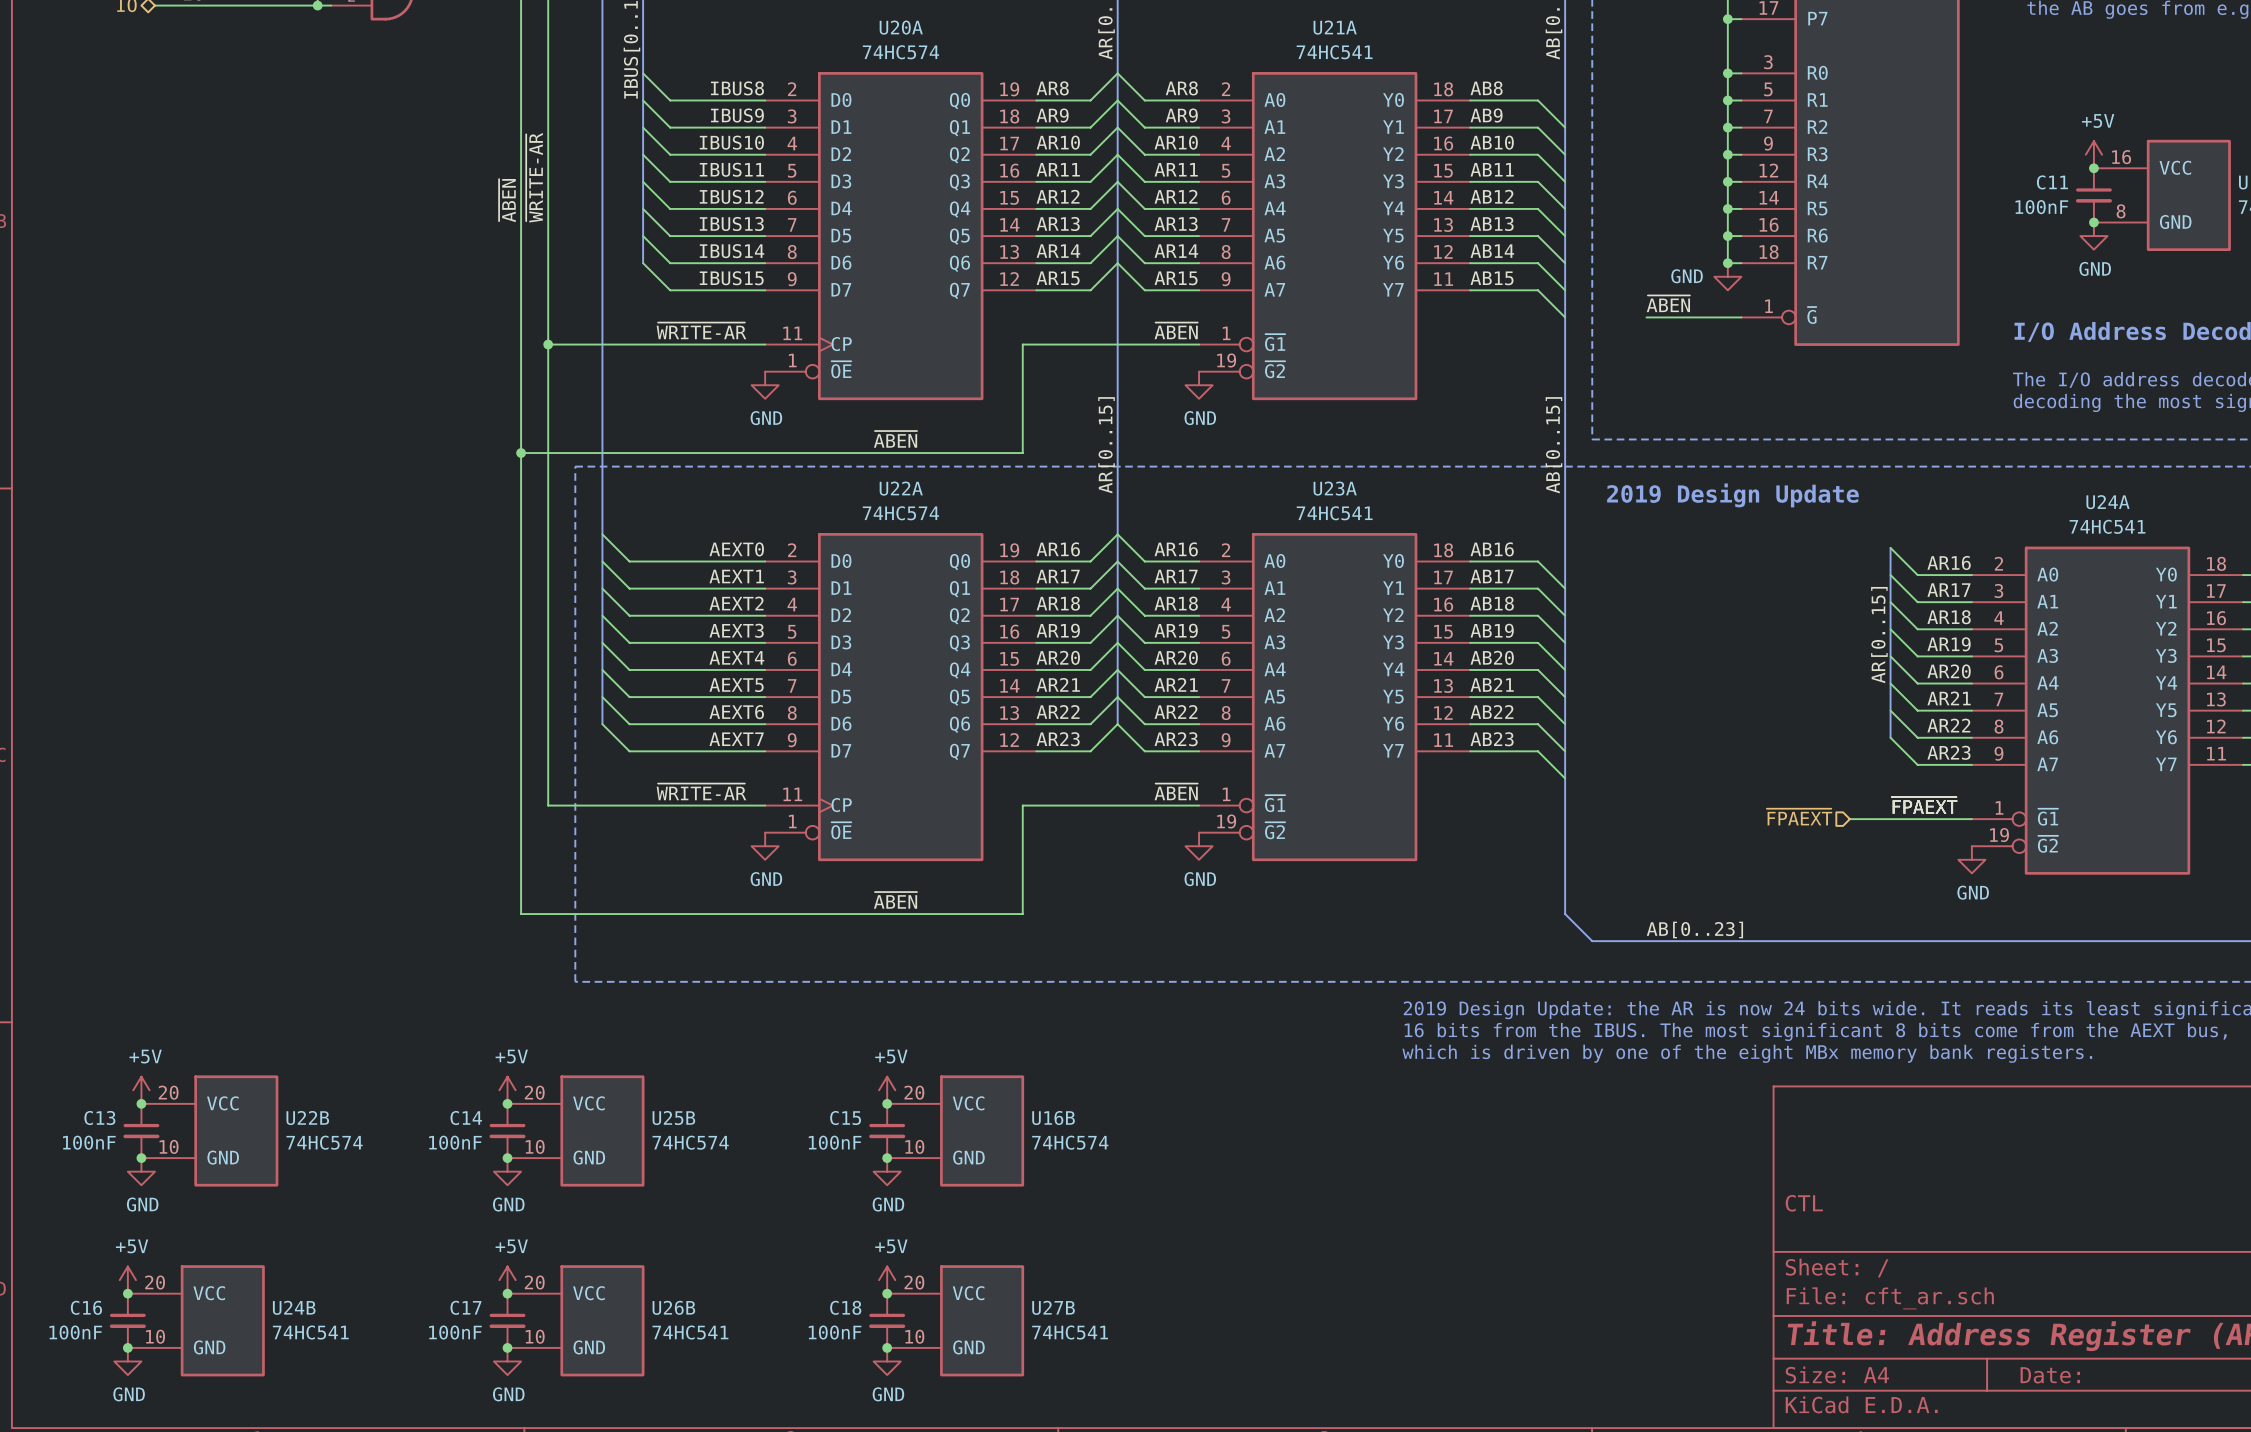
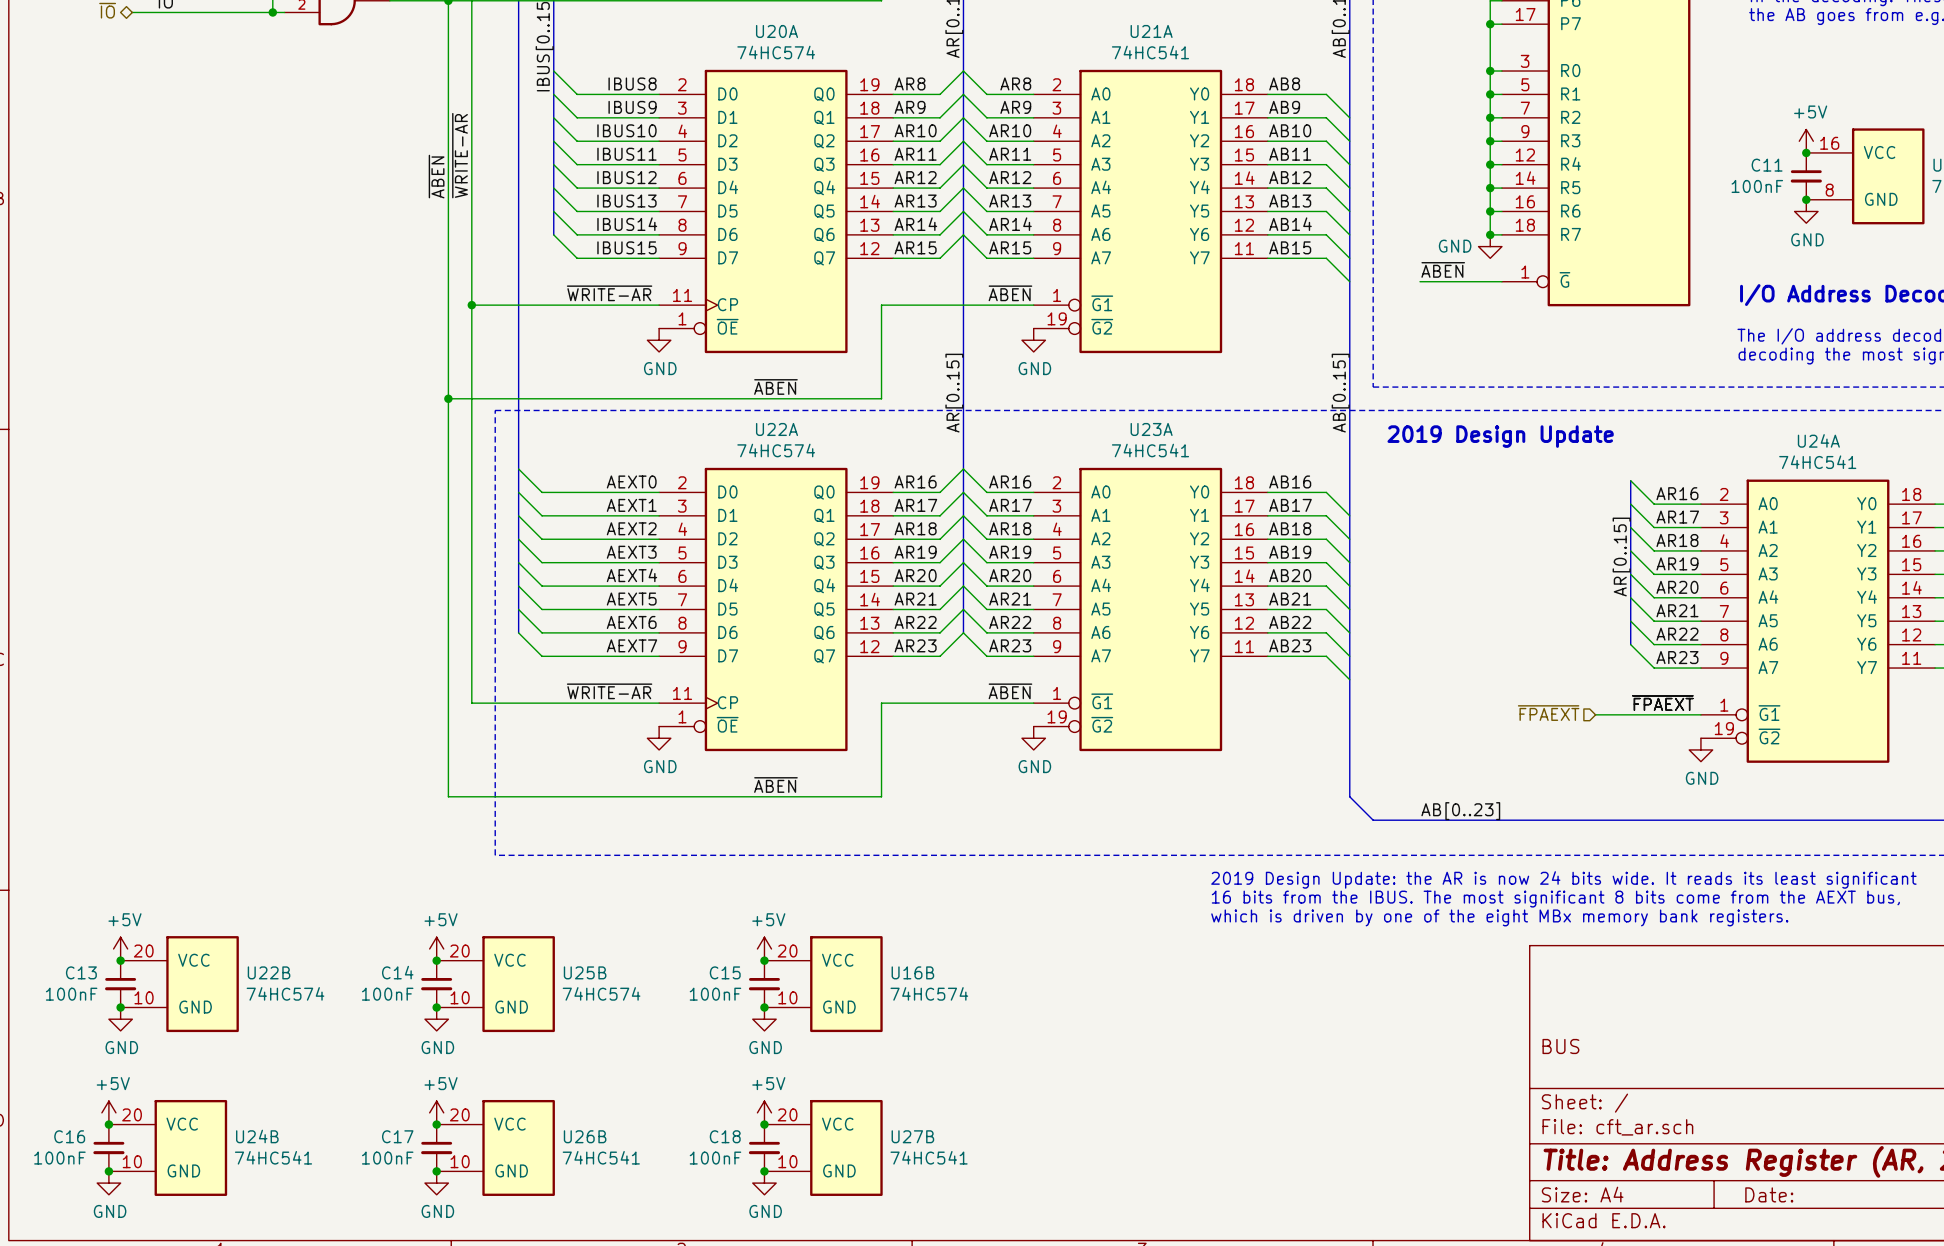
title block: CTL (1804, 1203) -> BUS (1560, 1046)

